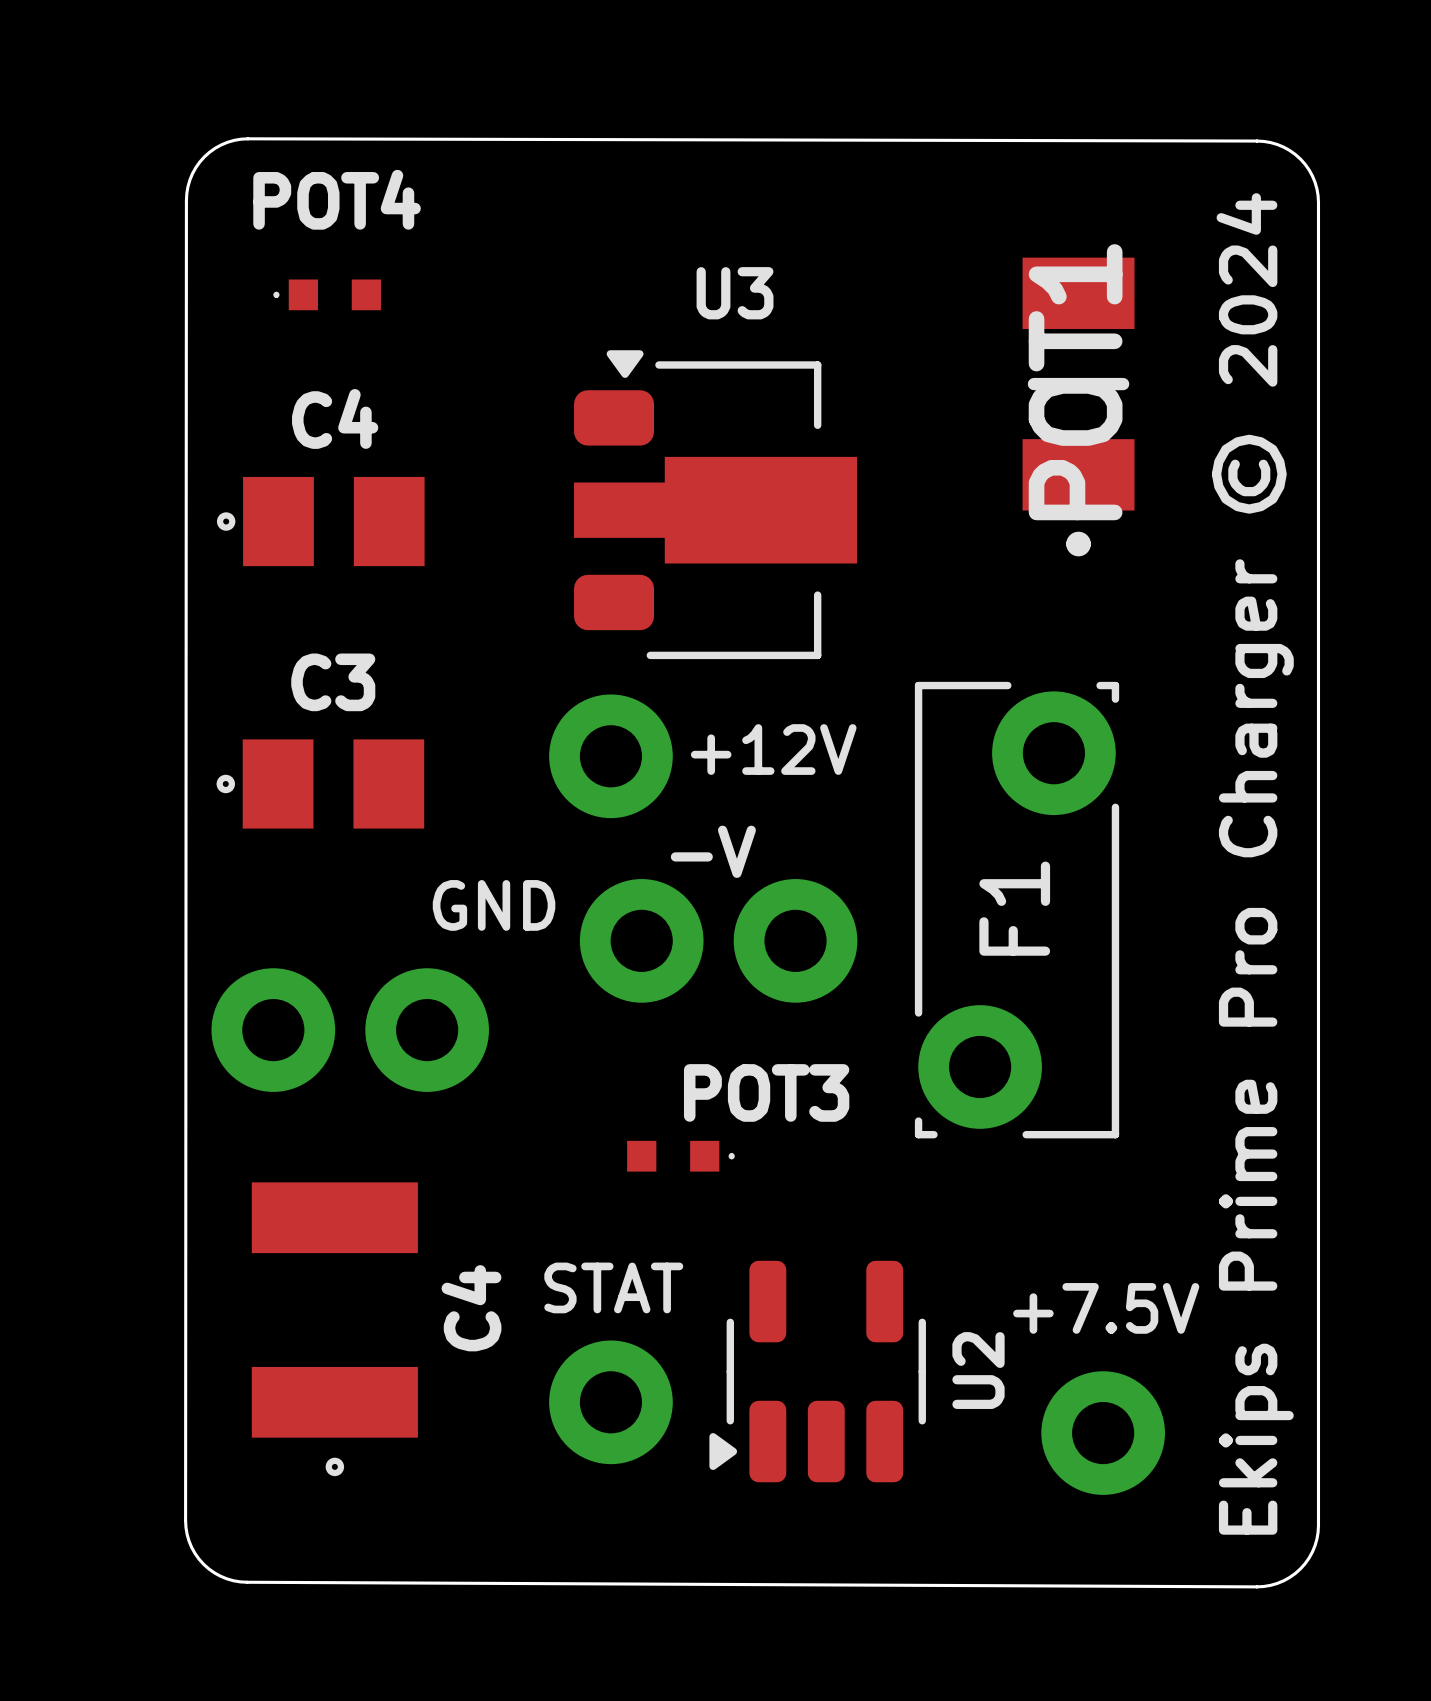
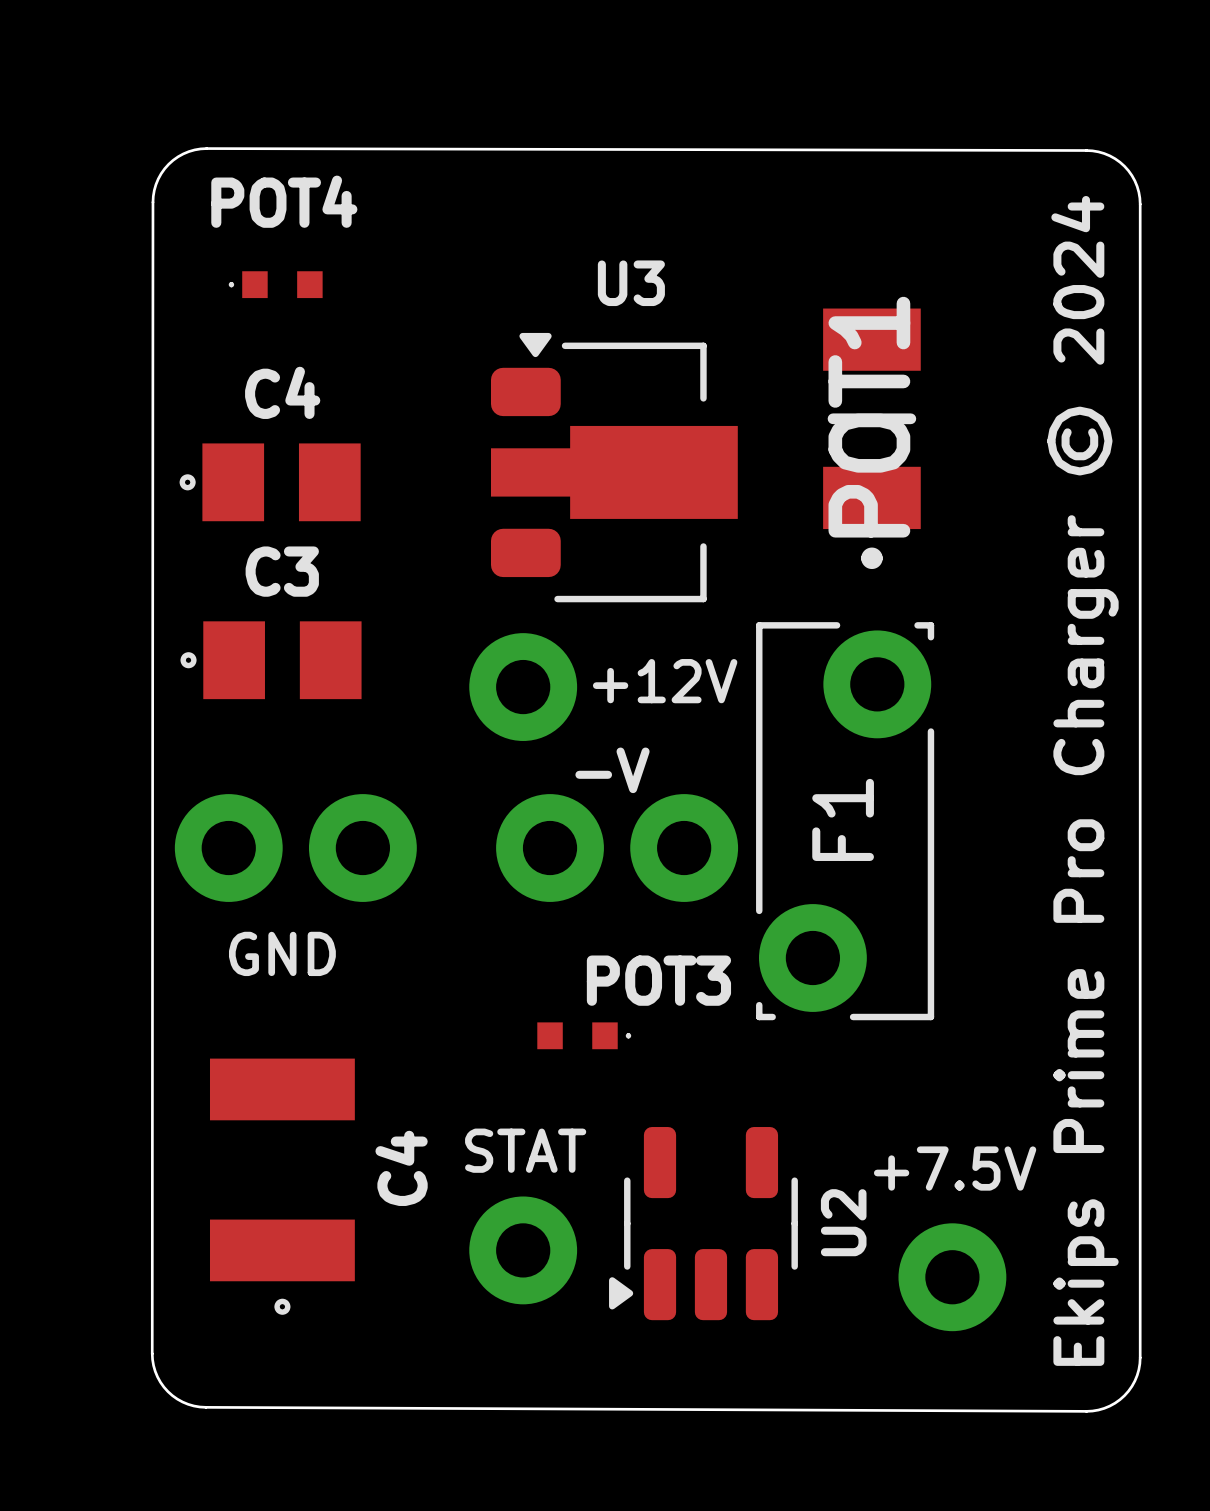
POT1 position: (1078, 406) -> (871, 438)
C3 position: (320, 783) -> (271, 660)
text position: GND (494, 905) -> GND (282, 953)
F1 position: (1017, 910) -> (845, 821)
part: none -> (228, 848)
part: none -> (362, 848)
part: (273, 1030) -> none
part: (427, 1030) -> none

